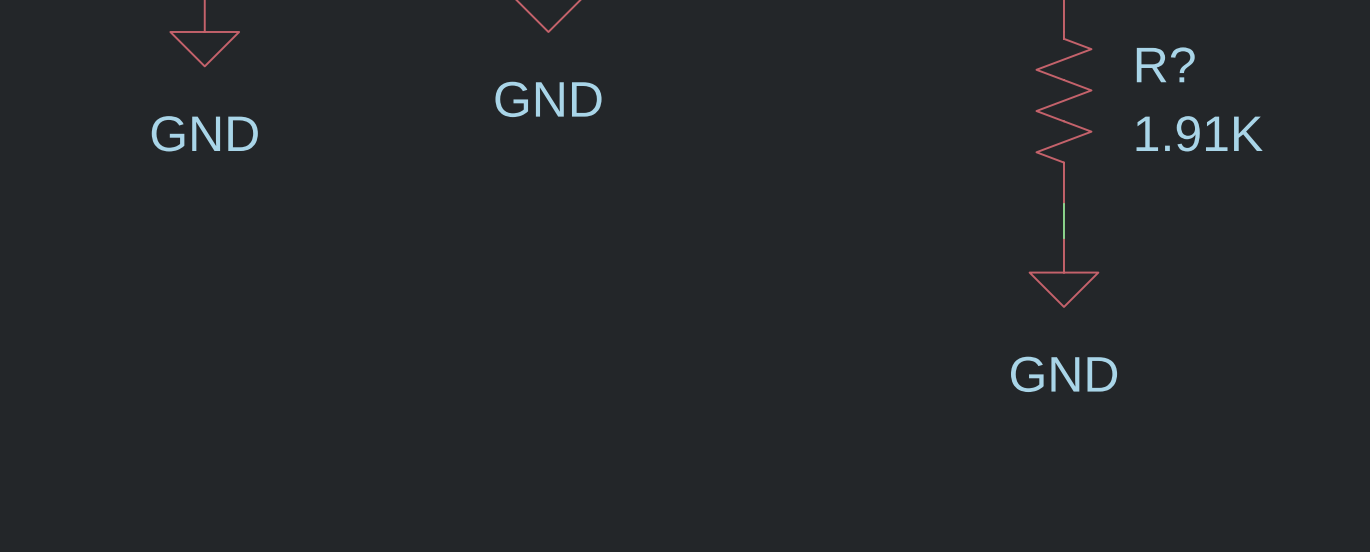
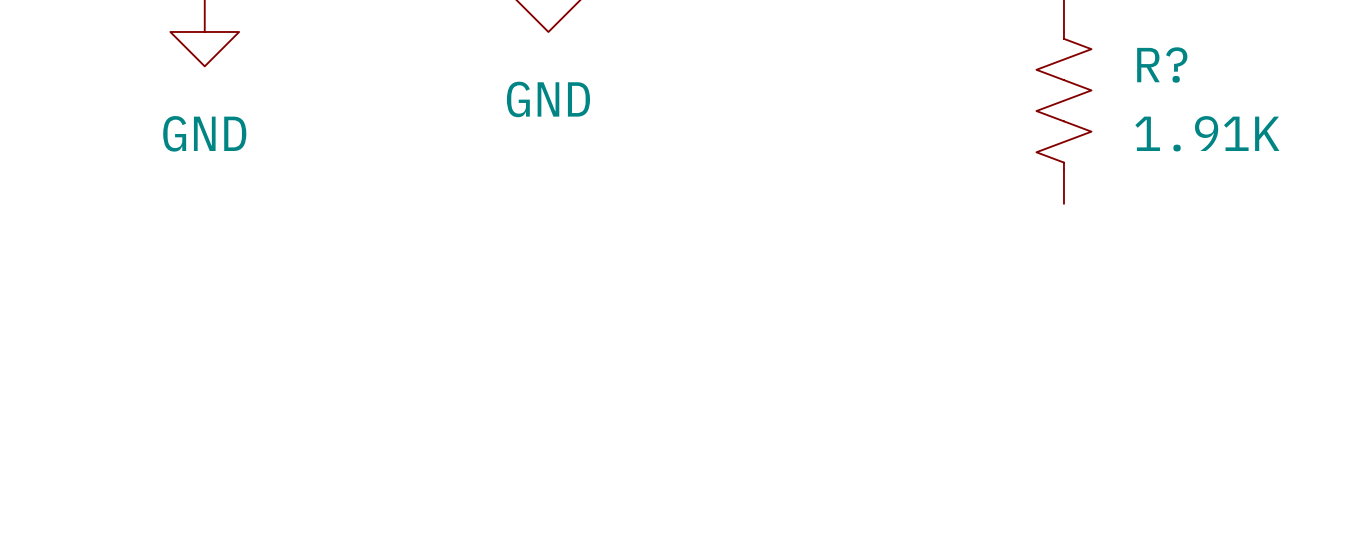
wire: (1063, 203) (1063, 238) -> none
power symbol: GND (1063, 272) -> none

